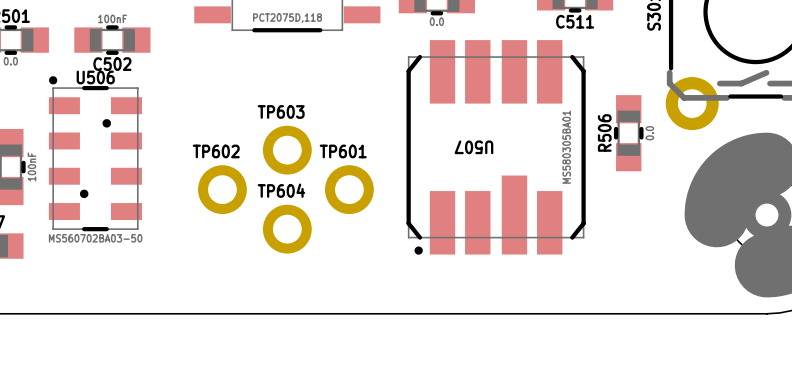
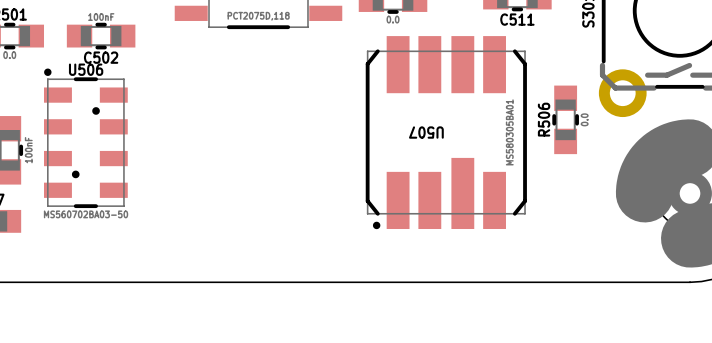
TP603: (287, 150) -> none
TP602: (222, 189) -> none
TP601: (349, 189) -> none
TP604: (287, 229) -> none

